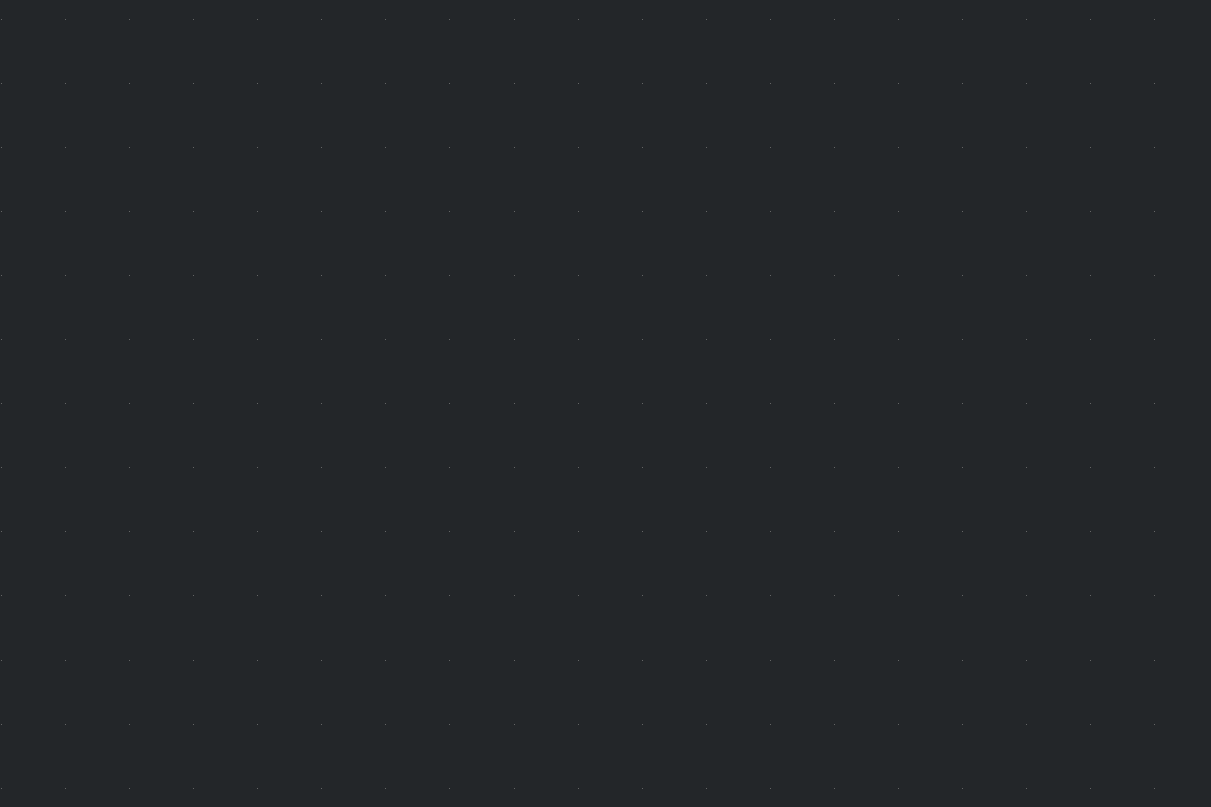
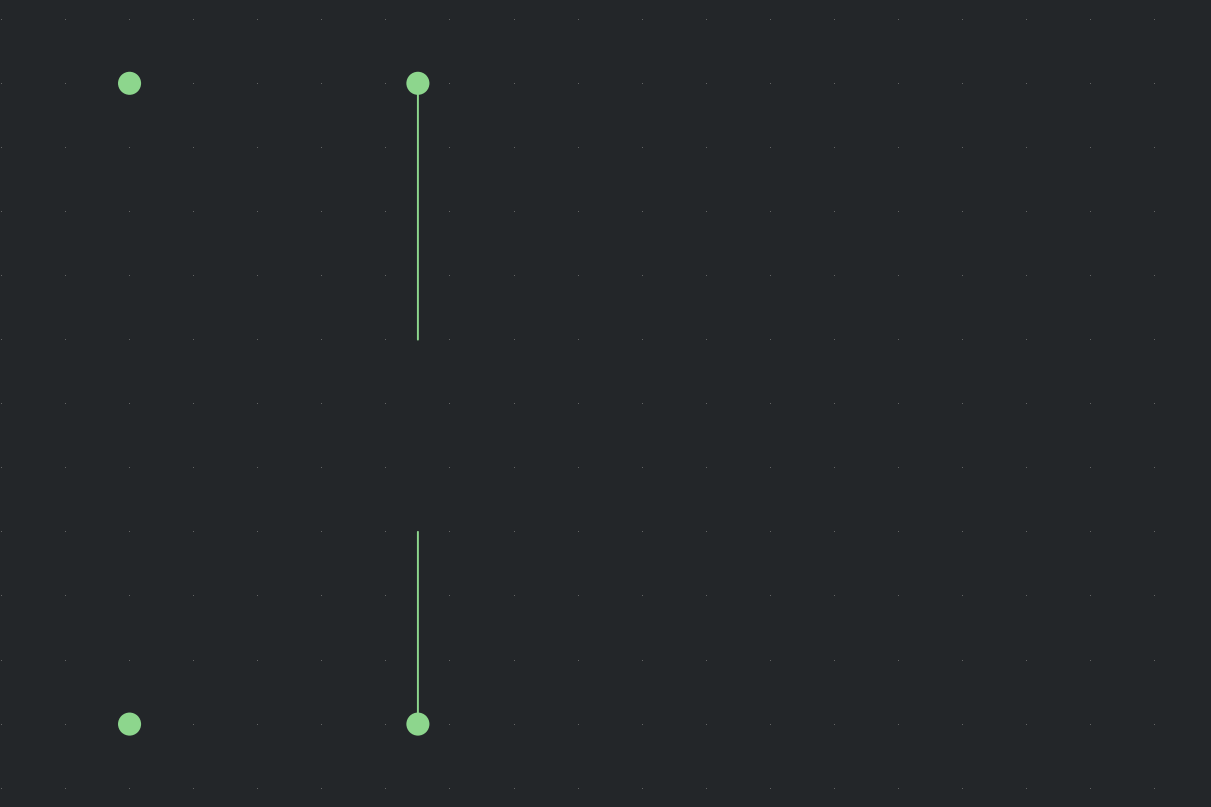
junction: none -> (129, 83)
wire: none -> (417, 83) (417, 339)
junction: none -> (417, 83)
wire: none -> (417, 531) (417, 724)
junction: none -> (129, 724)
junction: none -> (417, 724)

